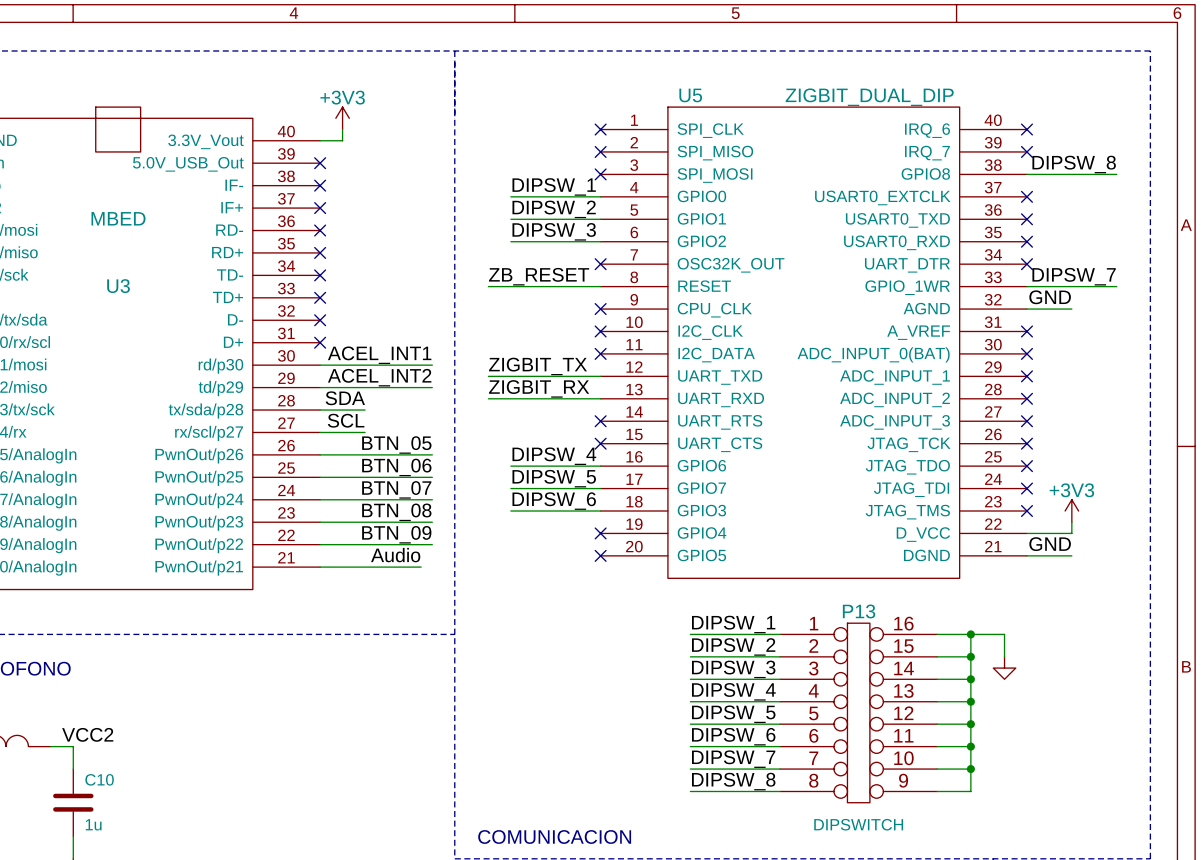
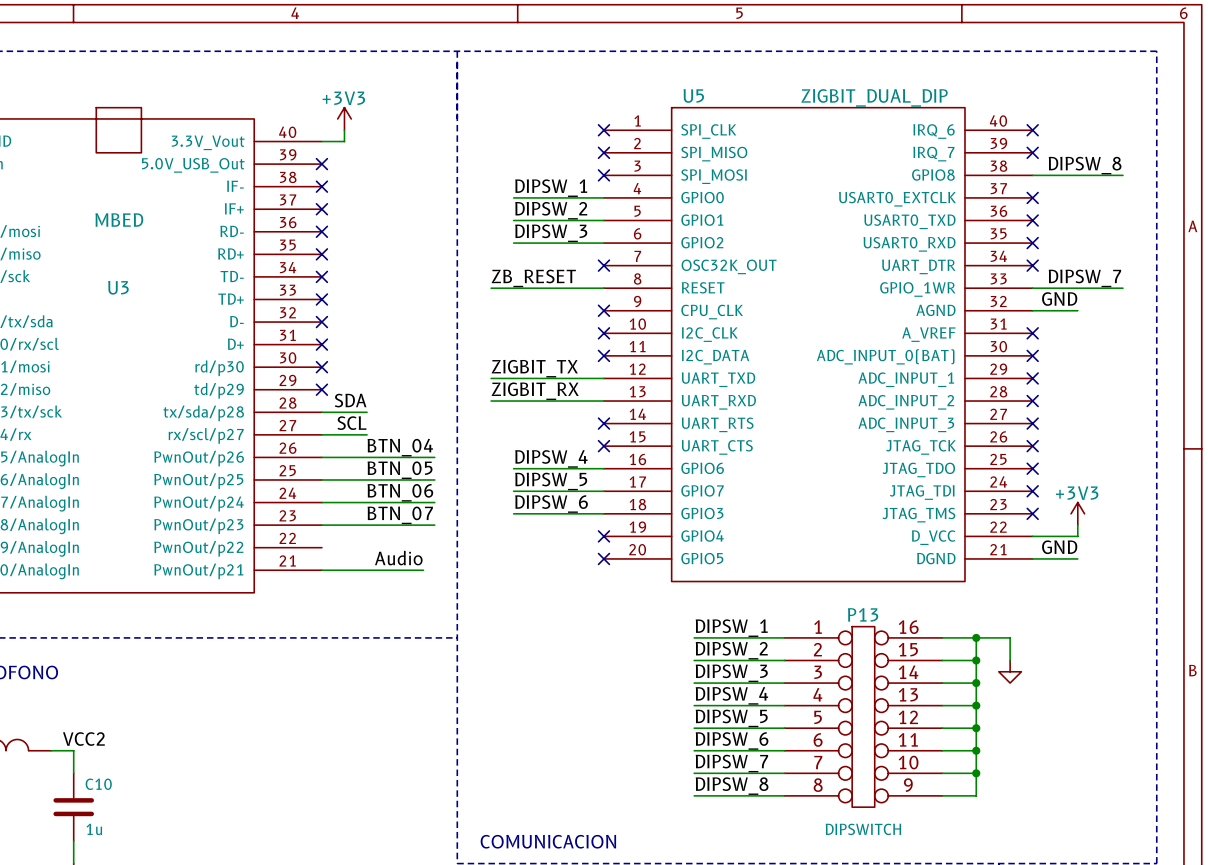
label: ACEL_INT1 (379, 355) -> none
wire: (320, 365) (432, 365) -> none
no-connect mark: none -> (321, 367)
label: ACEL_INT2 (379, 377) -> none
wire: (320, 387) (432, 387) -> none
no-connect mark: none -> (321, 389)
label: BTN_05 (396, 445) -> BTN_04 (400, 447)
label: BTN_06 (396, 467) -> BTN_05 (400, 470)
label: BTN_07 (396, 489) -> BTN_06 (400, 492)
label: BTN_08 (396, 512) -> BTN_07 (400, 515)
label: BTN_09 (396, 534) -> none
wire: (320, 544) (432, 544) -> none

